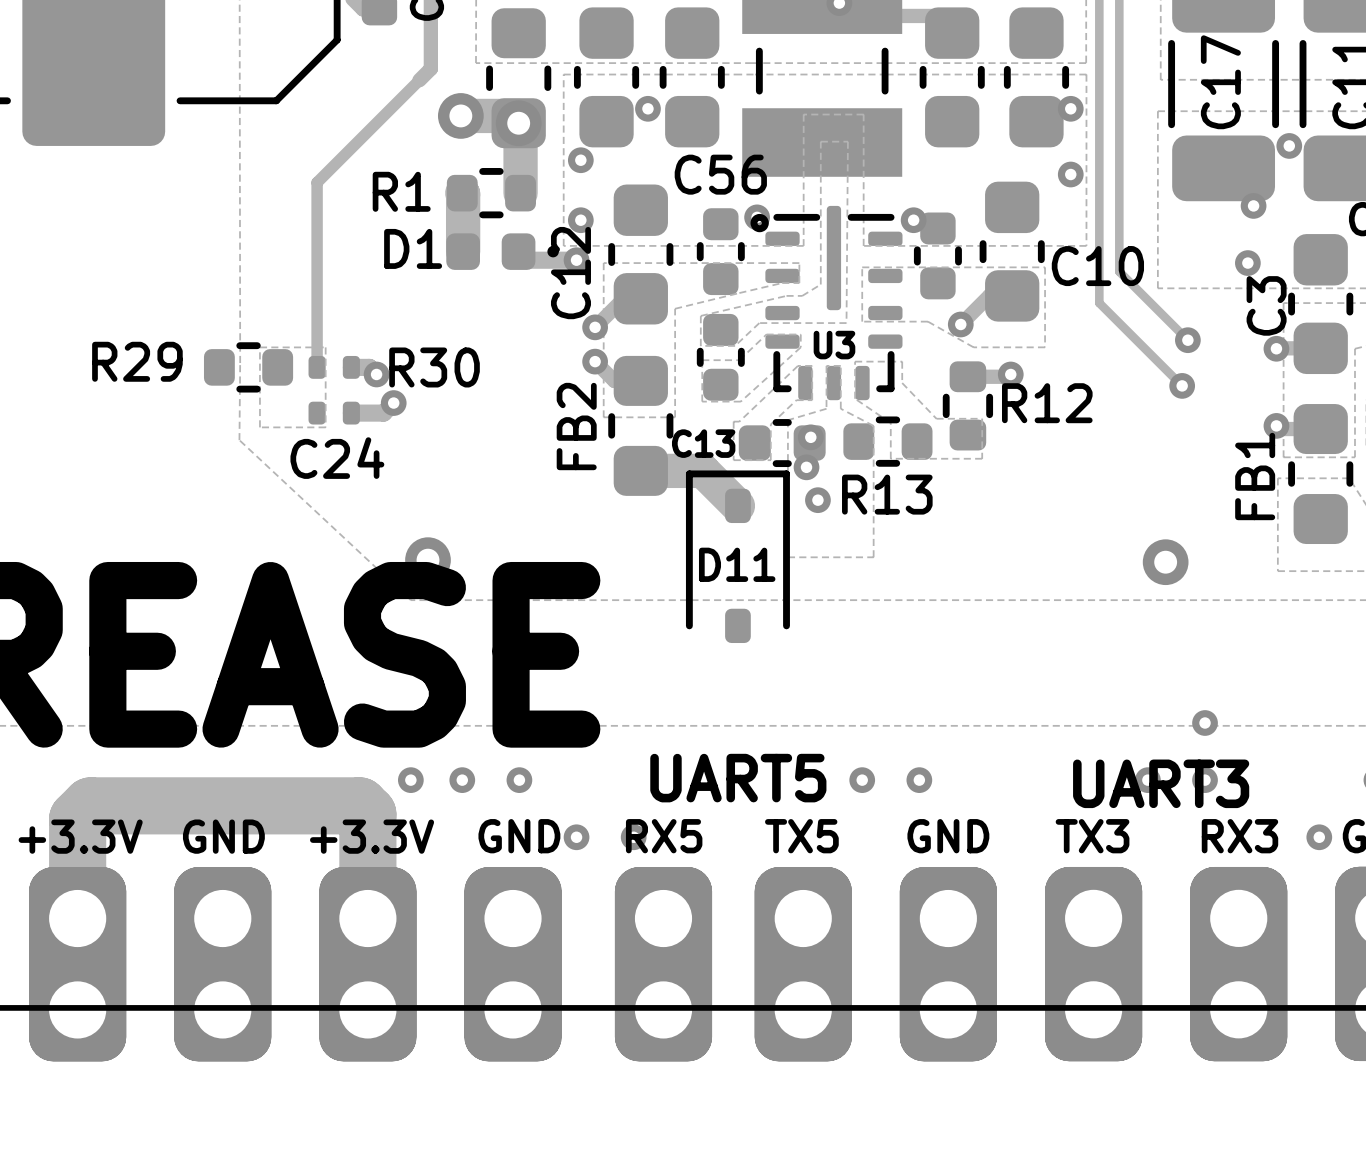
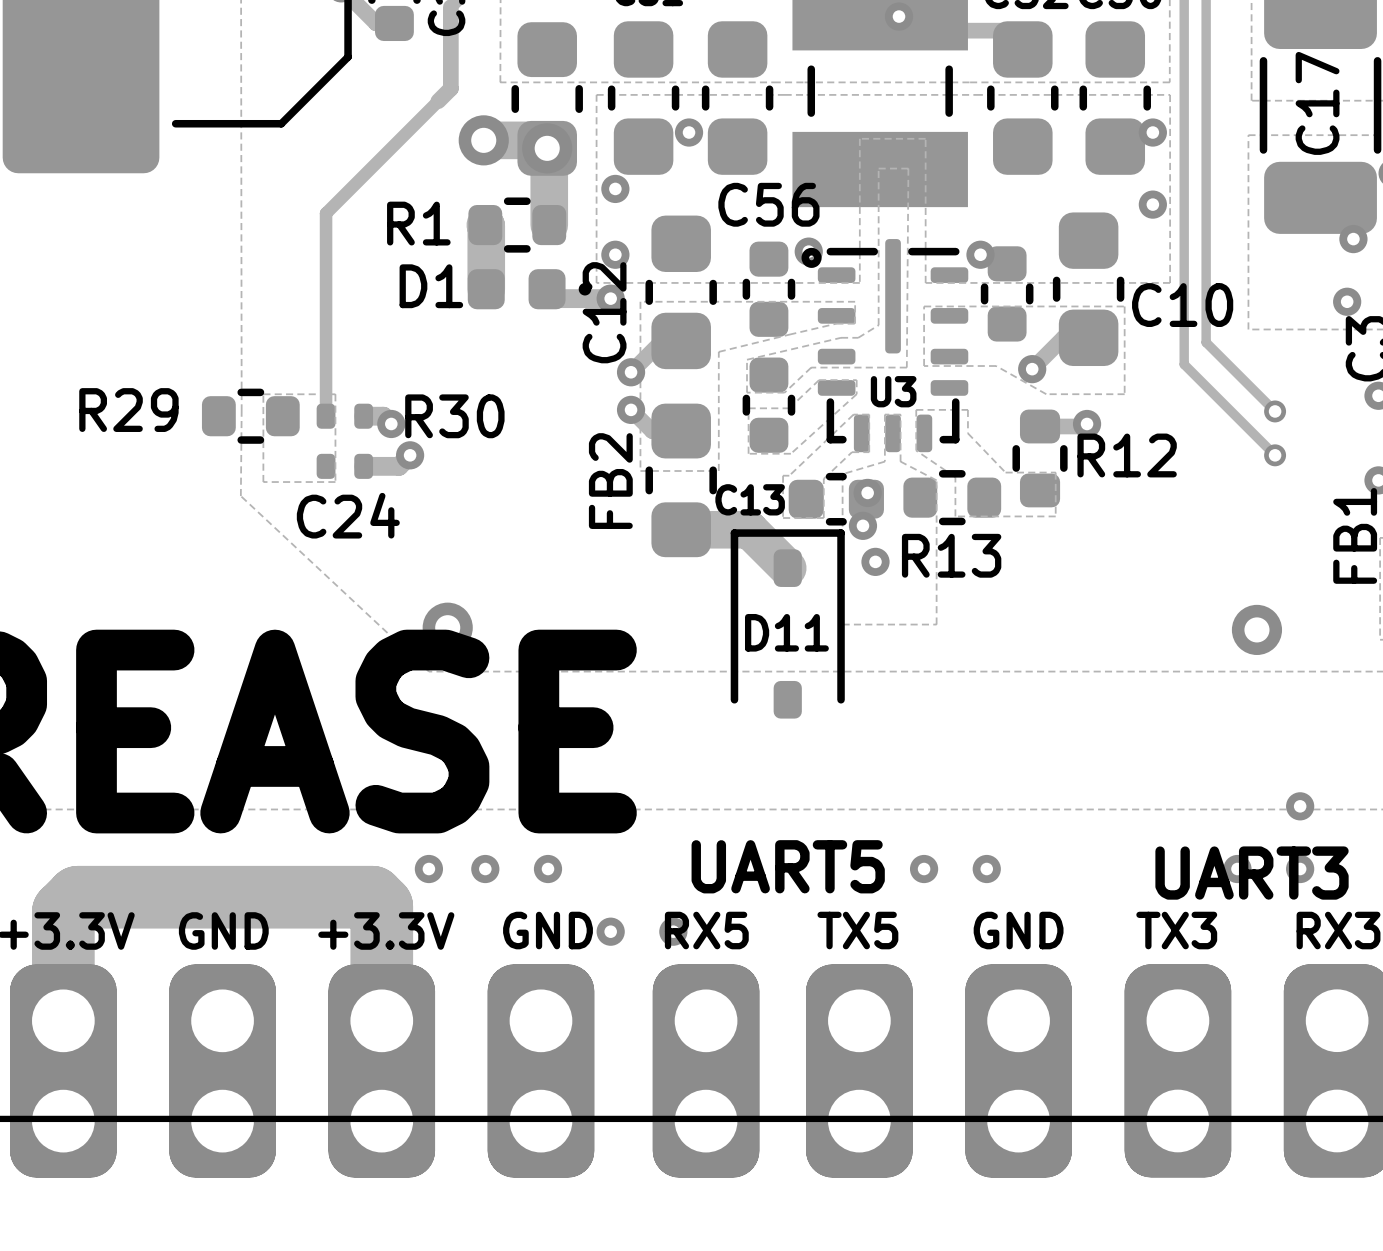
track: (1119, 271) (1187, 340) -> (1206, 311) (1206, 342) (1275, 411)
track: (1099, 303) (1182, 385) -> (1184, 345) (1184, 364) (1275, 455)
via: (1187, 340) -> none
via: none -> (1275, 411)
via: (1182, 385) -> none
via: none -> (1275, 455)

